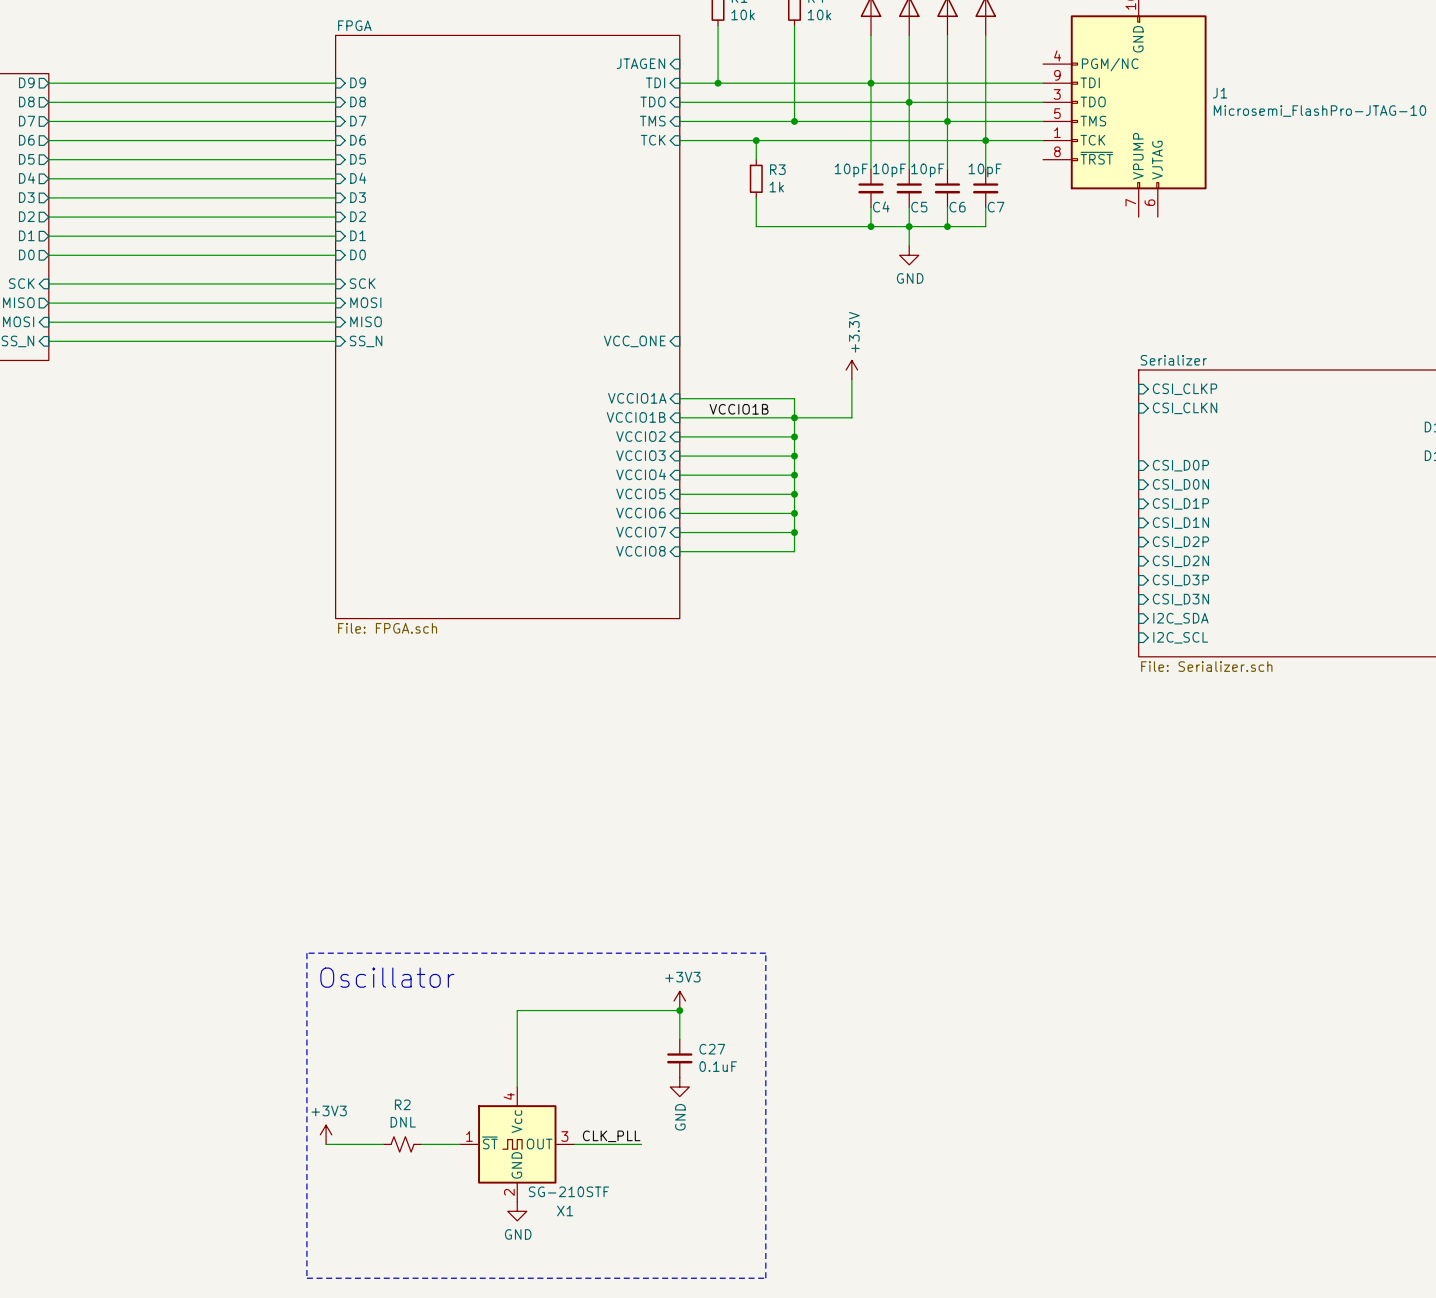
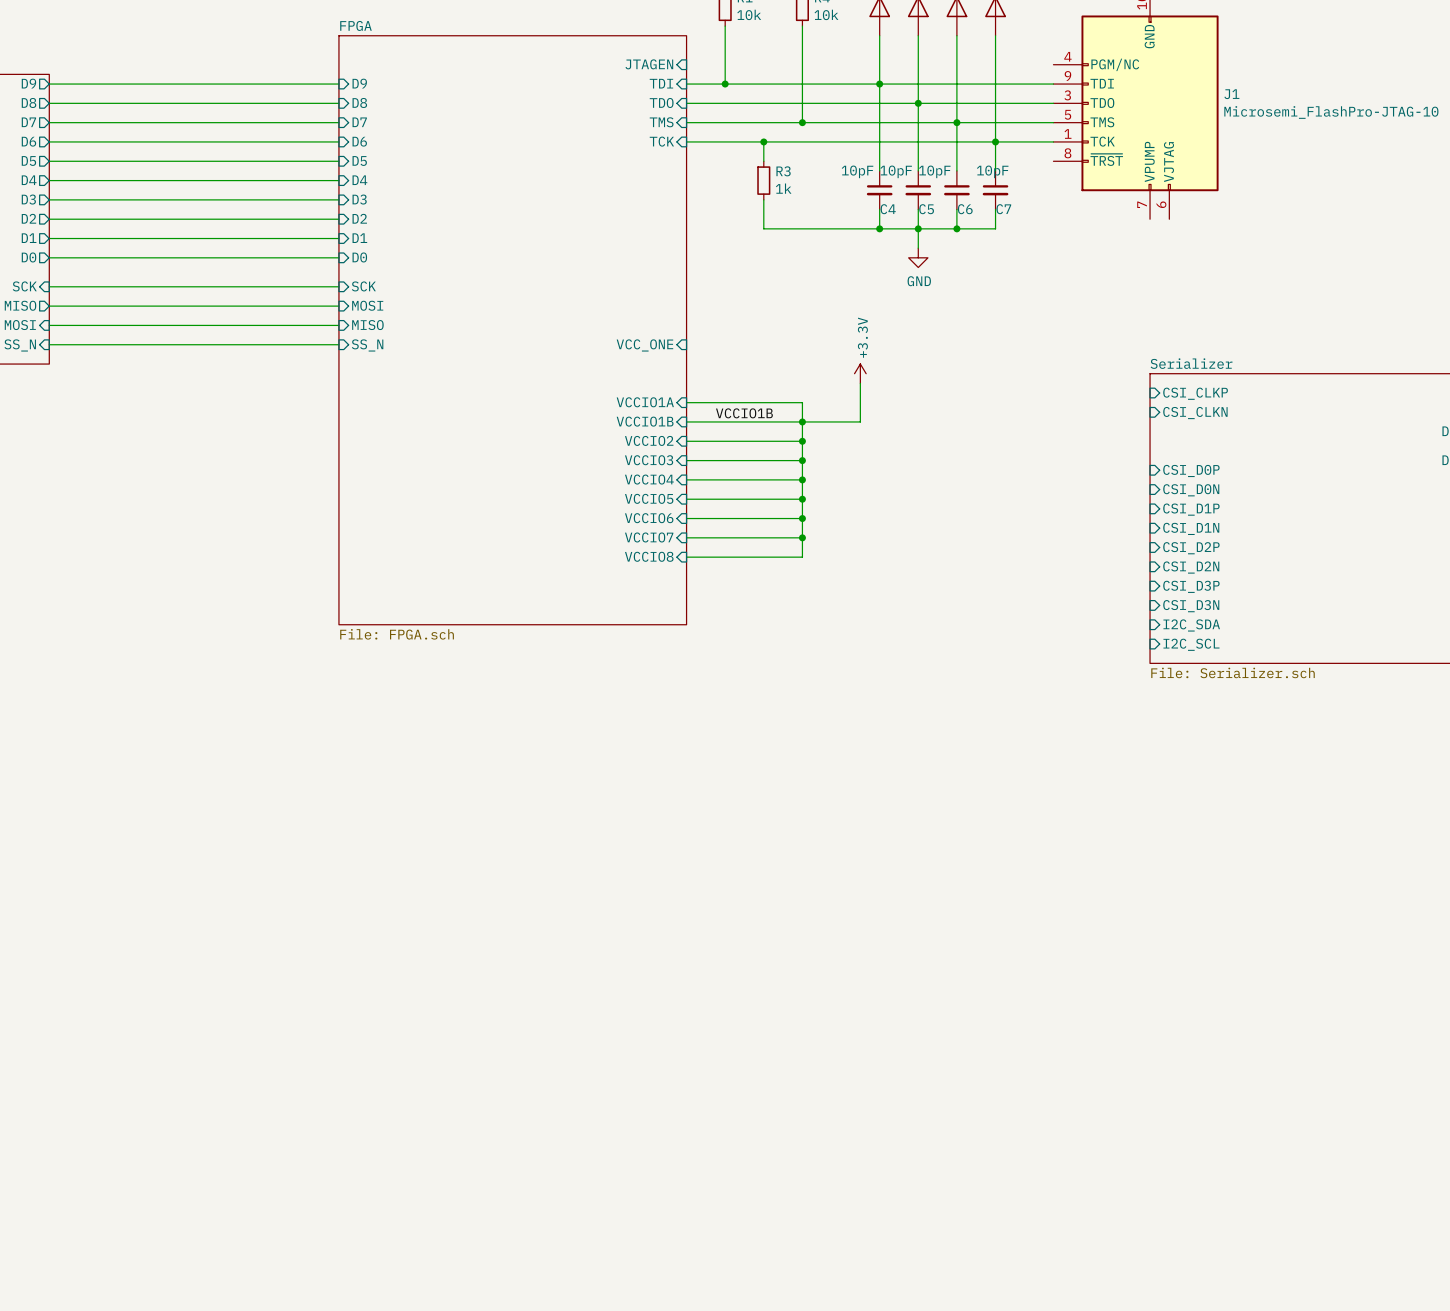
line: (306, 953) (765, 953) (765, 1278) (306, 1278) (306, 953) -> none
text: Oscillator (387, 977) -> none
power symbol: +3V3 (679, 1000) -> none
junction: (679, 1010) -> none
wire: (679, 1039) (679, 1010) (517, 1010) (517, 1087) -> none
C27: 0.1uF (679, 1058) -> none
power symbol: GND (679, 1087) -> none
power symbol: +3V3 (326, 1134) -> none
label: CLK_PLL (611, 1136) -> none
wire: (326, 1144) (383, 1144) -> none
R2: DNL (402, 1144) -> none
wire: (421, 1144) (459, 1144) -> none
X1: SG-210STF (517, 1144) -> none
wire: (574, 1144) (641, 1144) -> none
power symbol: GND (517, 1211) -> none

